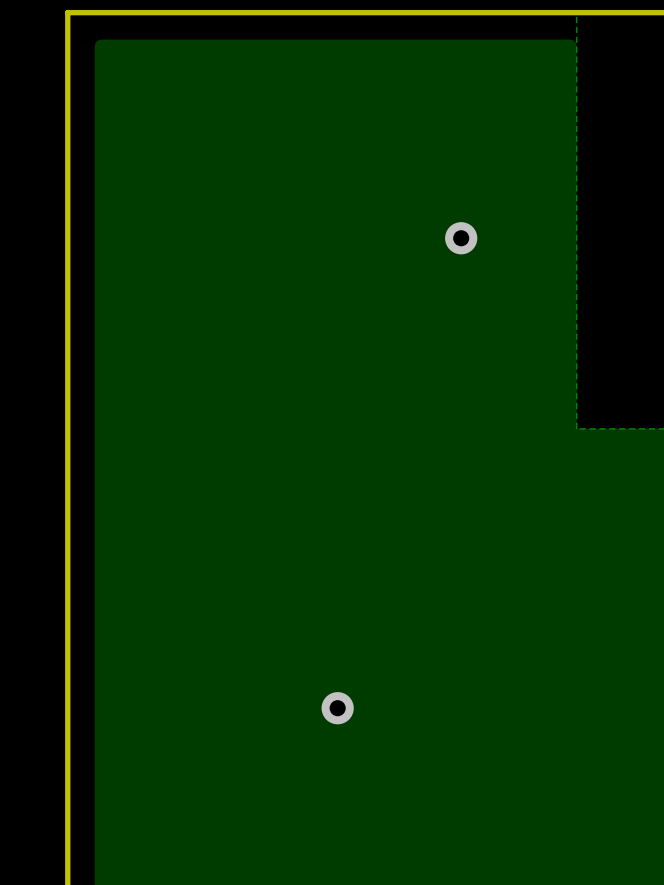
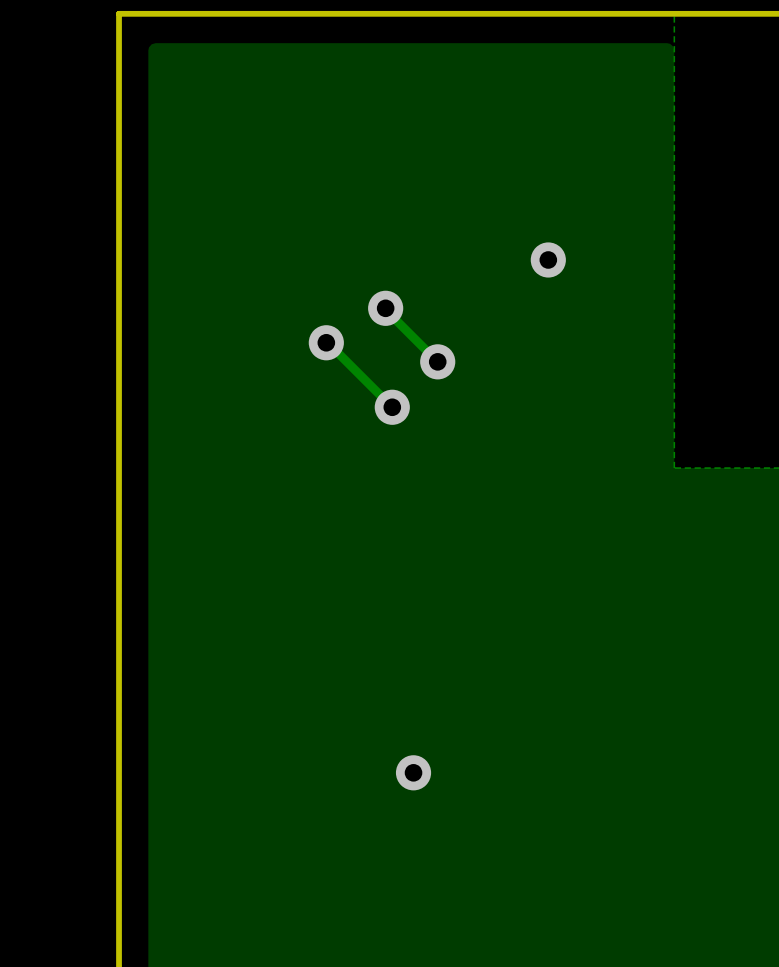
track: none -> (385, 308) (437, 361)
via: none -> (385, 308)
track: none -> (326, 342) (392, 407)
via: none -> (326, 342)
via: none -> (437, 361)
via: none -> (392, 407)

